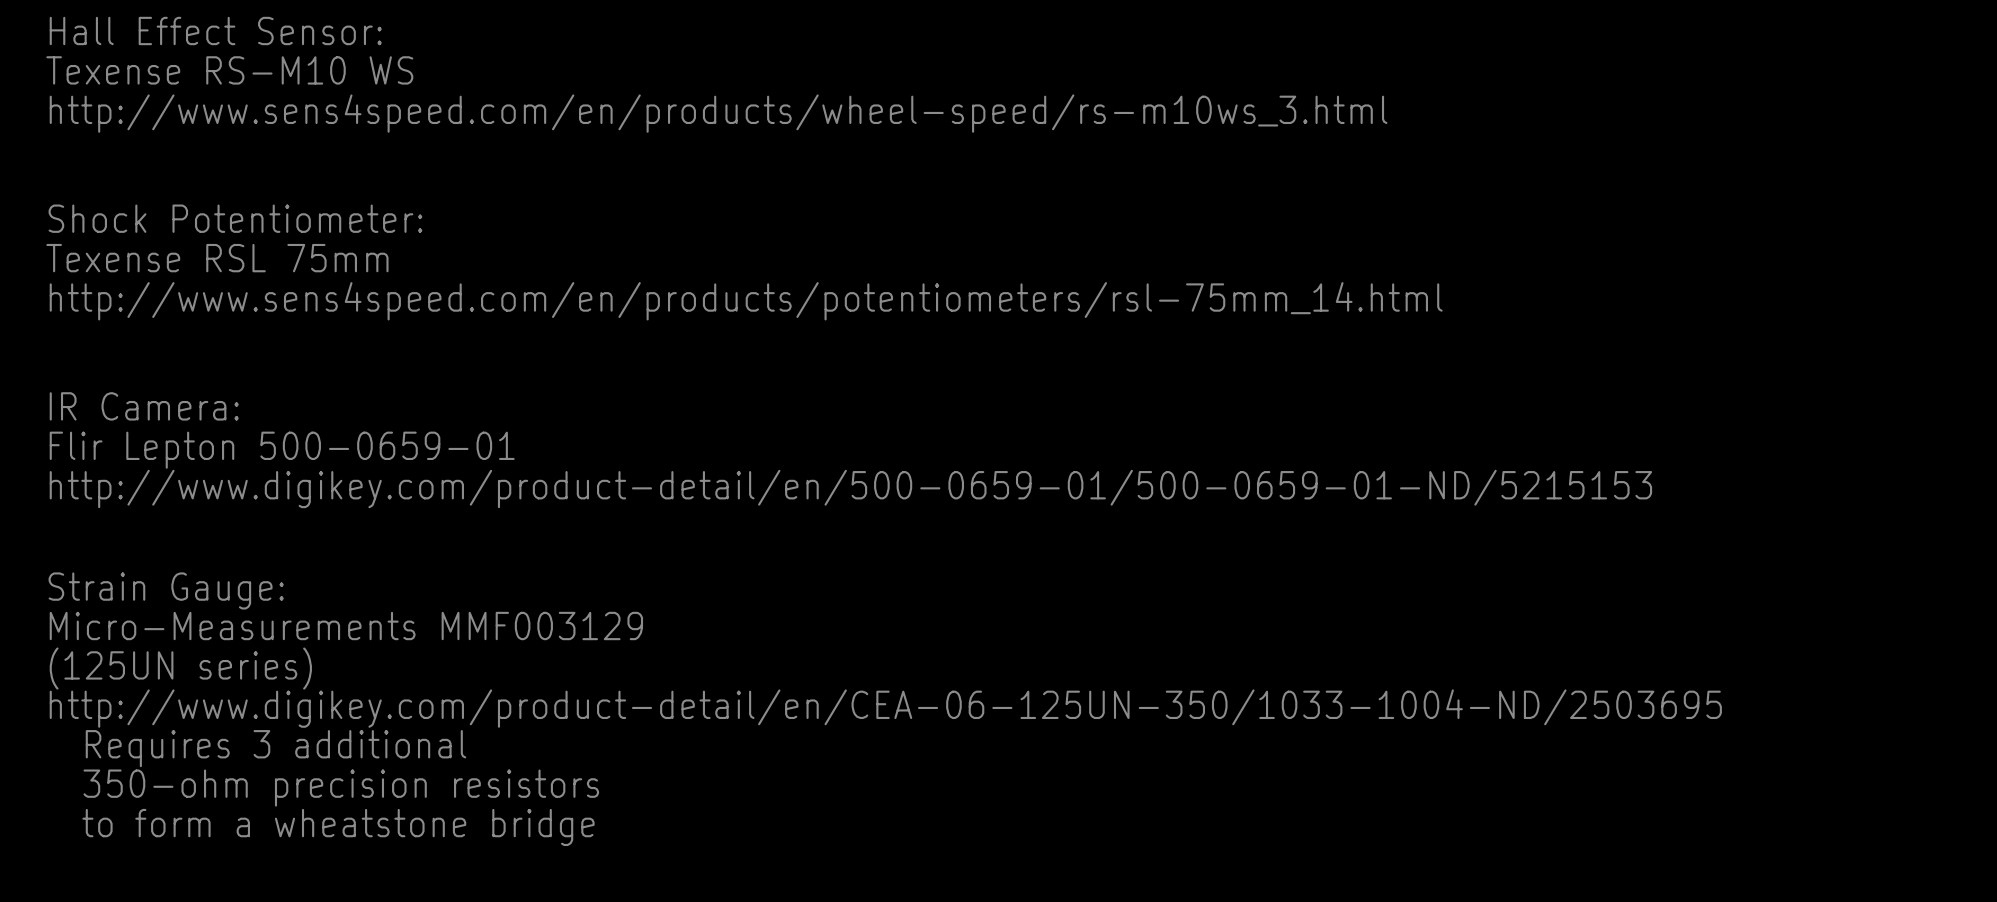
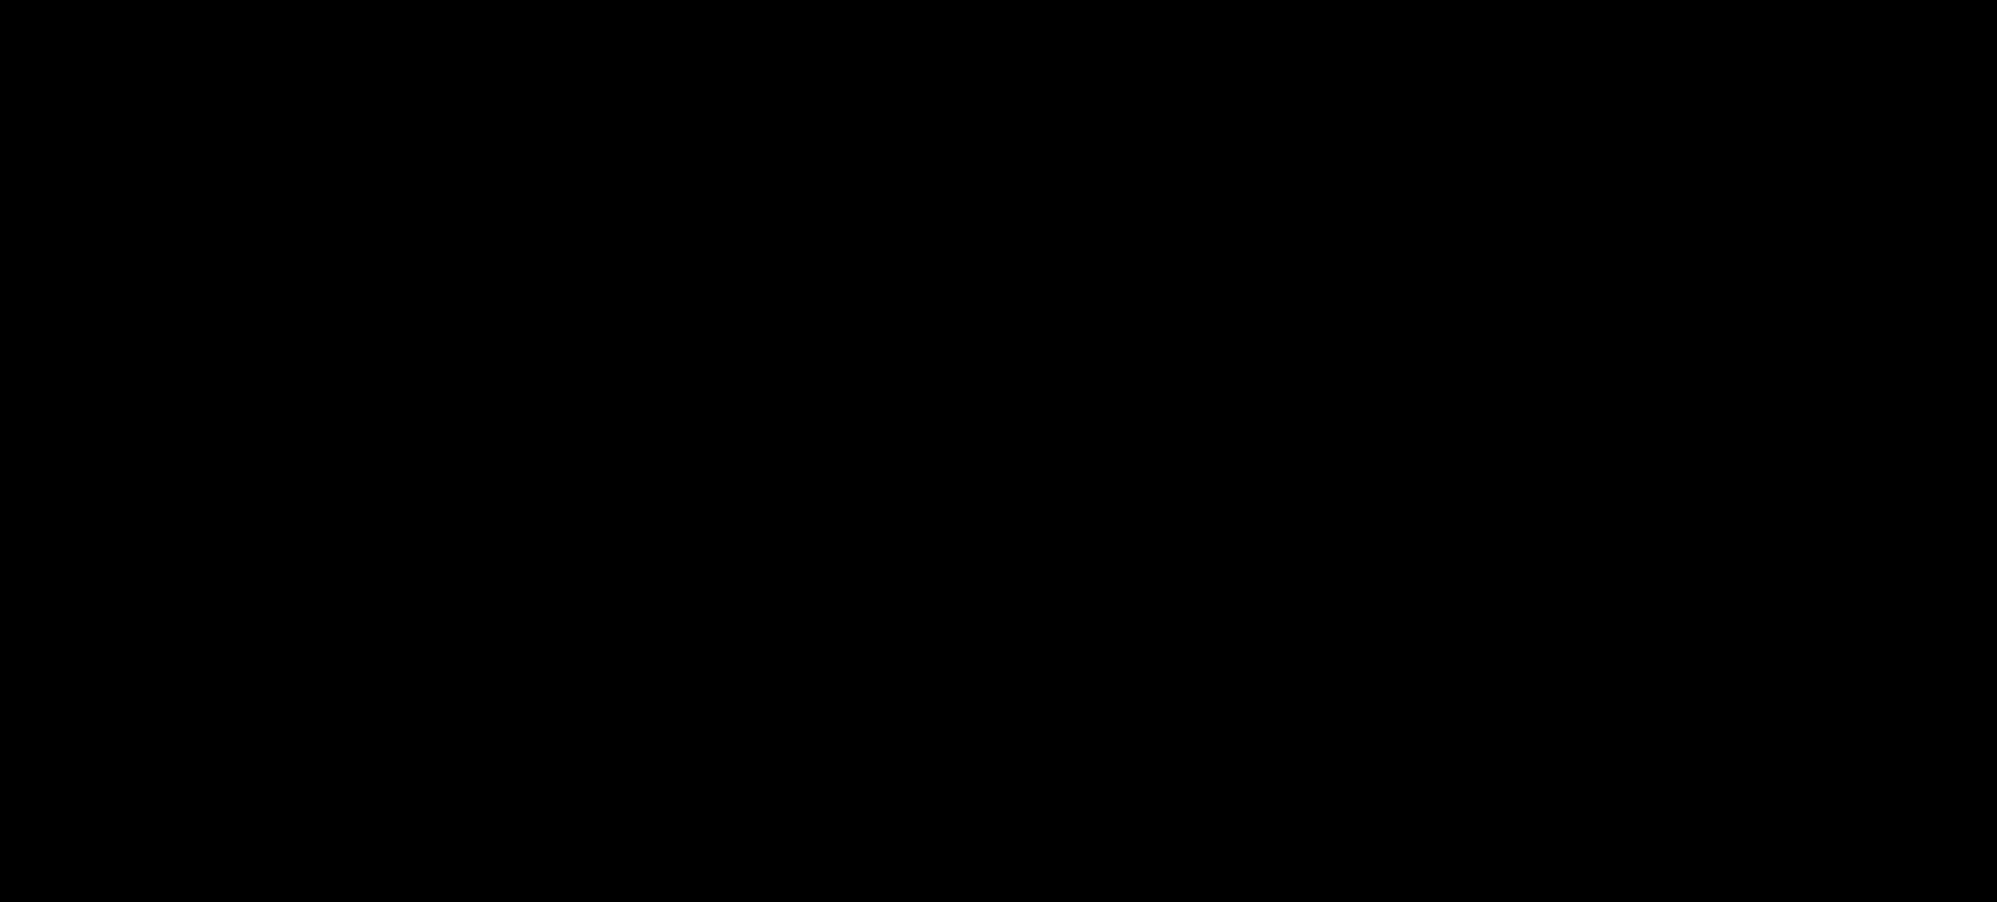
text: Hall Effect Sensor: (215, 31) -> none
text: Texense RS-M10 WS (229, 70) -> none
text: http://www.sens4speed.com/en/products/wheel-speed/rs-m10ws_3.html (718, 113) -> none
text: Shock Potentiometer: (235, 218) -> none
text: Texense RSL 75mm (217, 258) -> none
text: http://www.sens4speed.com/en/products/potentiometers/rsl-75mm_14.html (746, 301) -> none
text: IR Camera: (144, 406) -> none
text: Flir Lepton 500-0659-01 (282, 450) -> none
text: http://www.digikey.com/product-detail/en/500-0659-01/500-0659-01-ND/5215153 (850, 488) -> none
text: Strain Gauge: (166, 590) -> none
text: Micro-Measurements MMF003129 (346, 625) -> none
text: (125UN series) (180, 668) -> none
text: http://www.digikey.com/product-detail/en/CEA-06-125UN-350/1033-1004-ND/2503695 (885, 708) -> none
text: Requires 3 additional (275, 748) -> none
text: 350-ohm precision resistors (341, 788) -> none
text: to form a wheatstone bridge (338, 827) -> none

